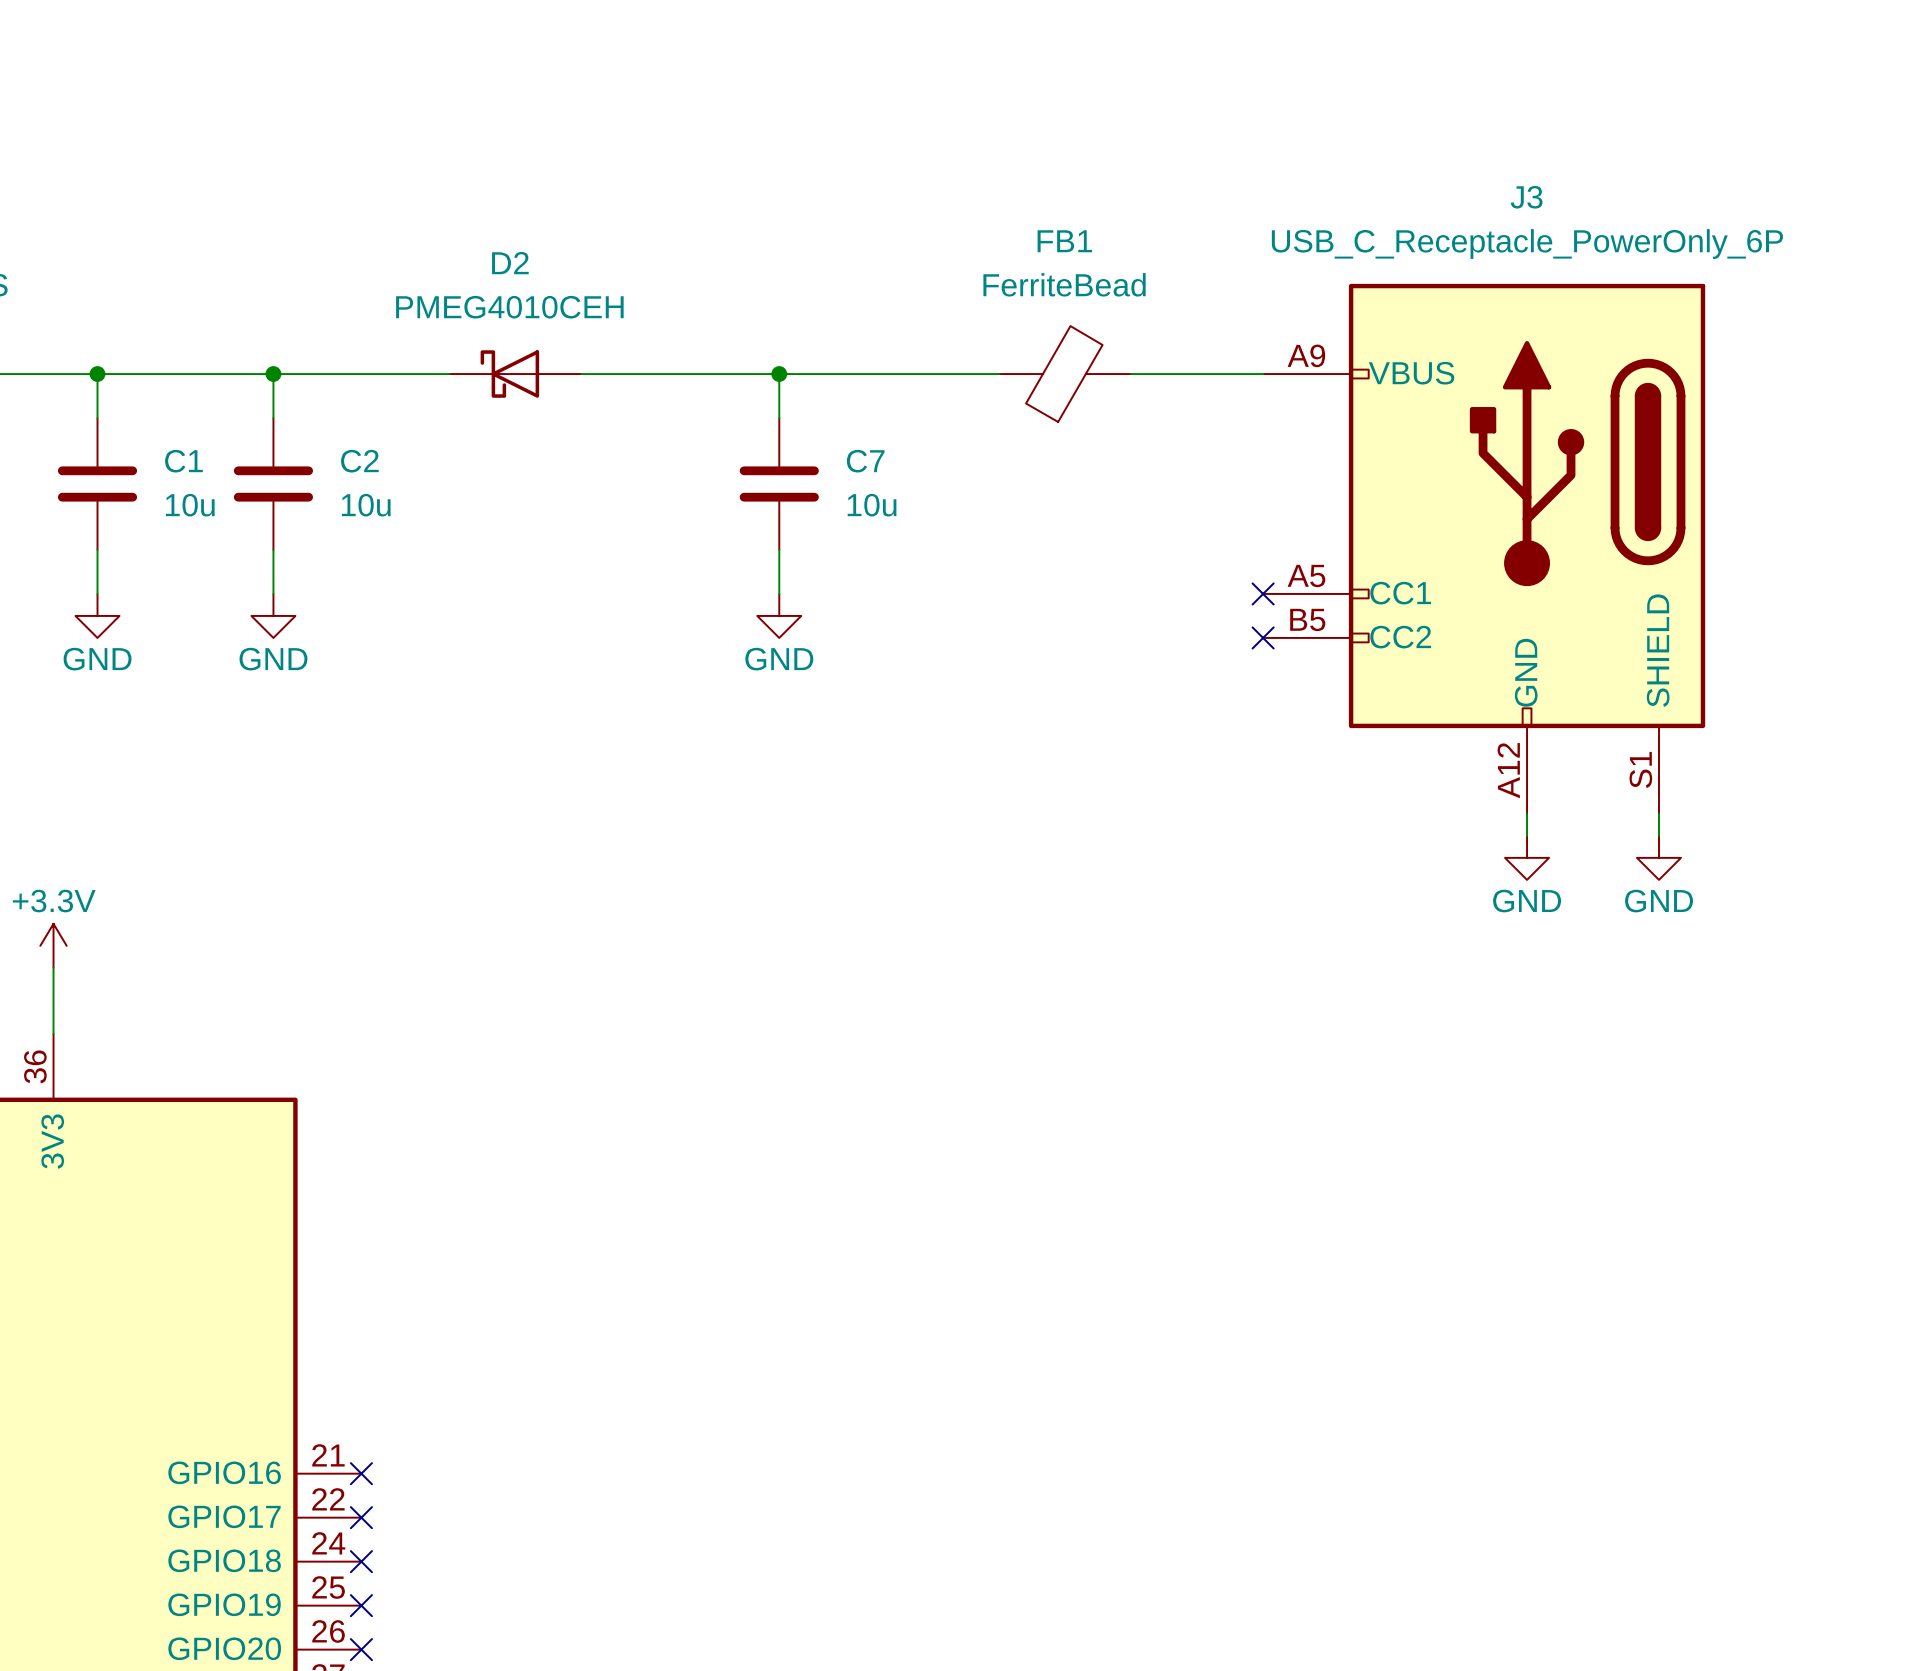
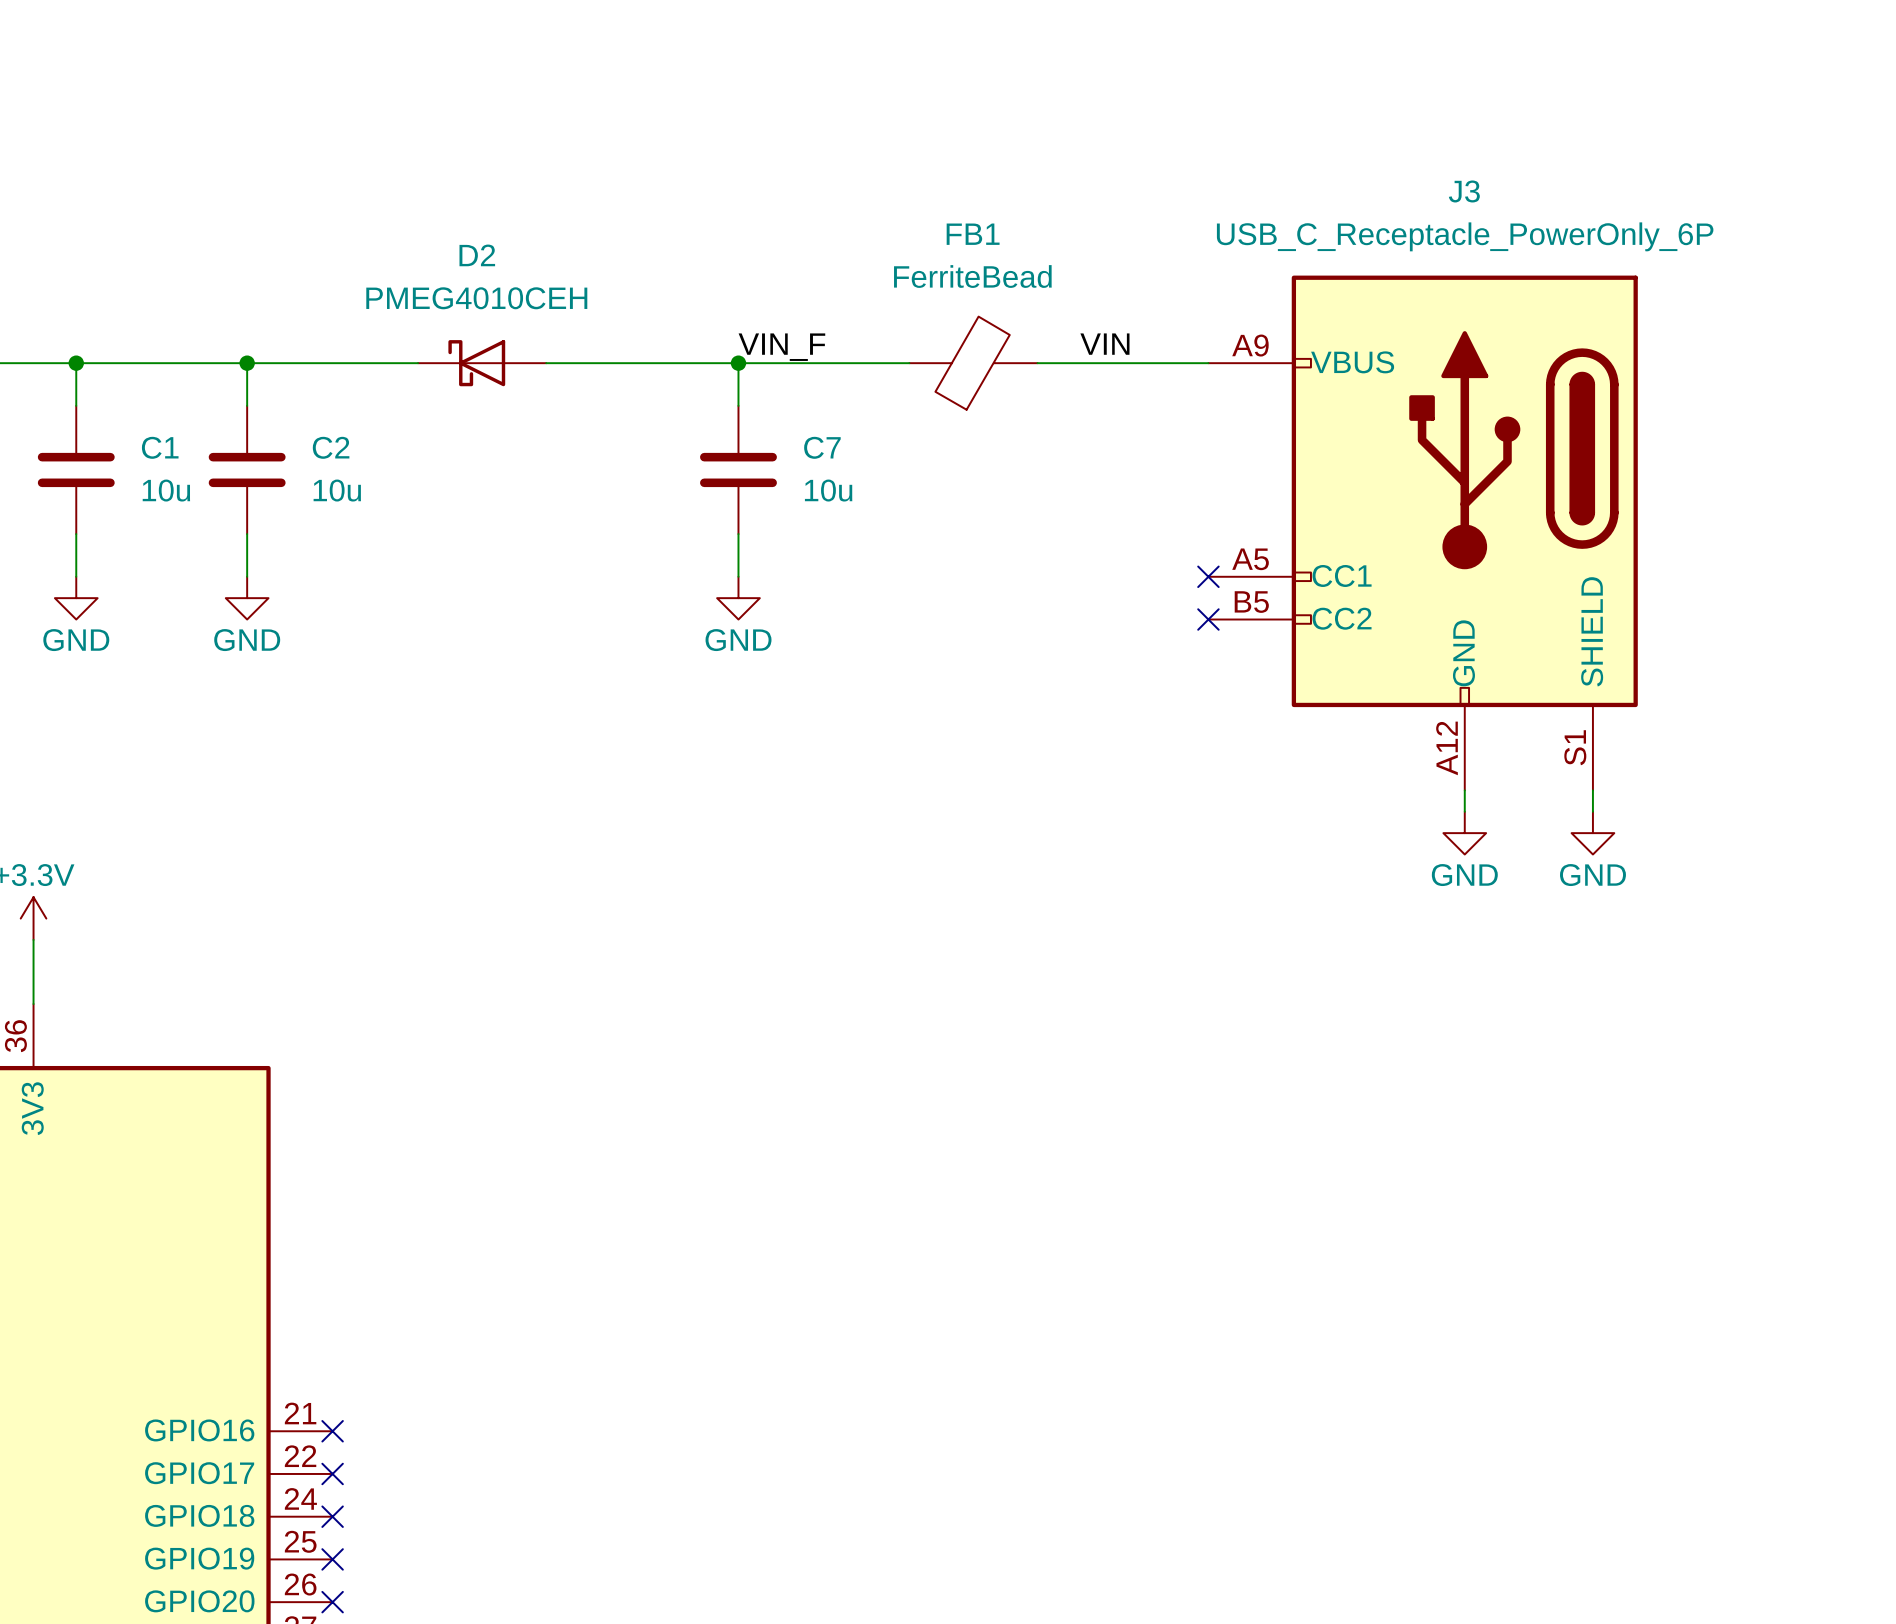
label: none -> VIN (1104, 344)
label: none -> VIN_F (781, 347)
FB1 position: (1065, 374) -> (973, 363)

